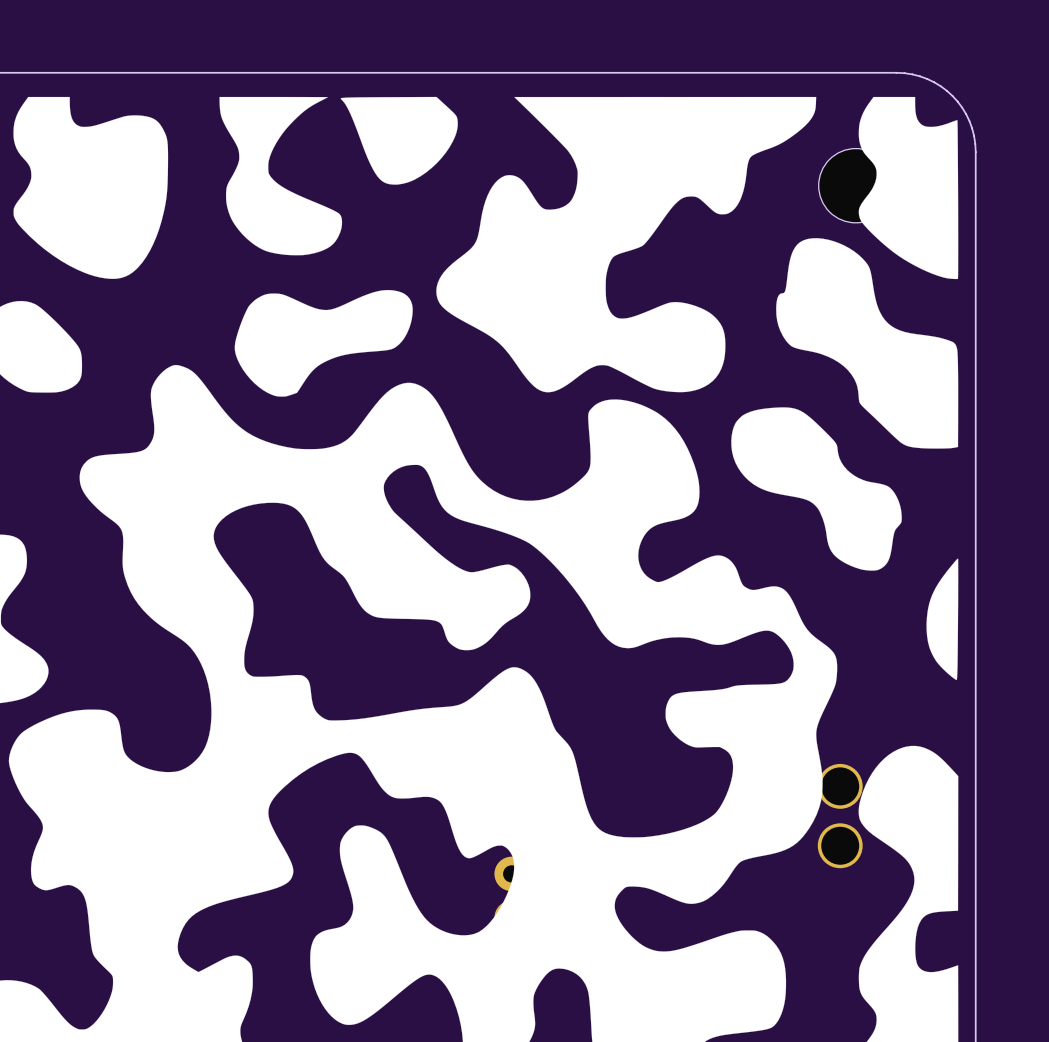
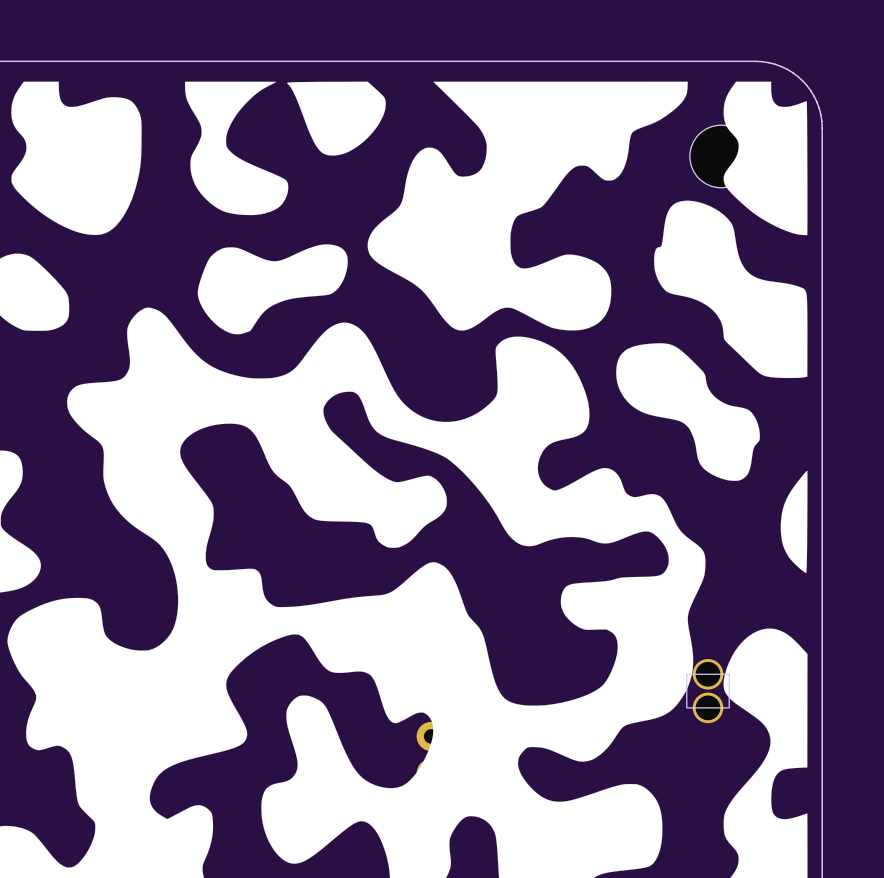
part footprint: [817, 763, 863, 869] -> [686, 658, 730, 724]

